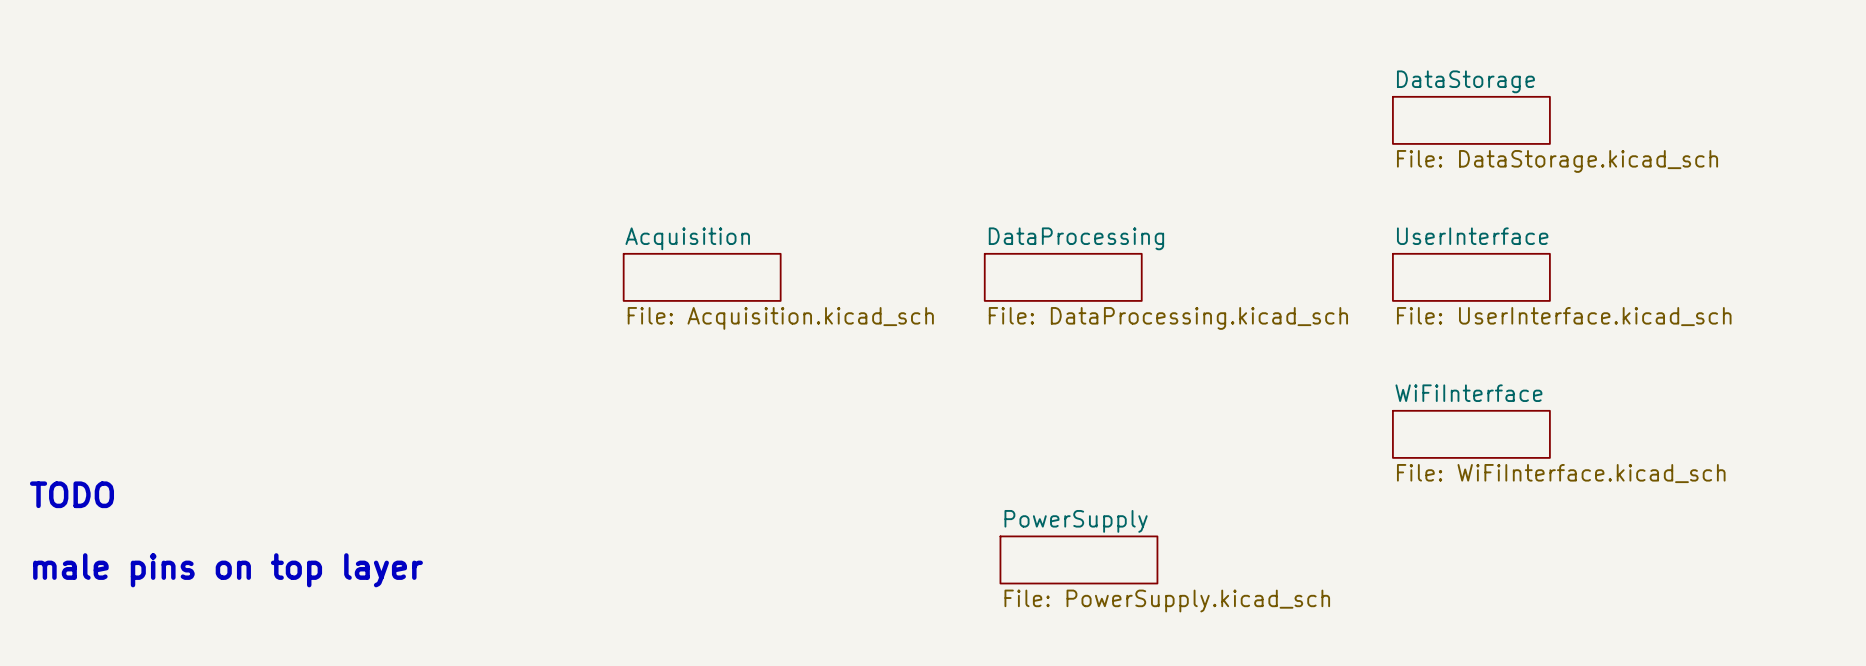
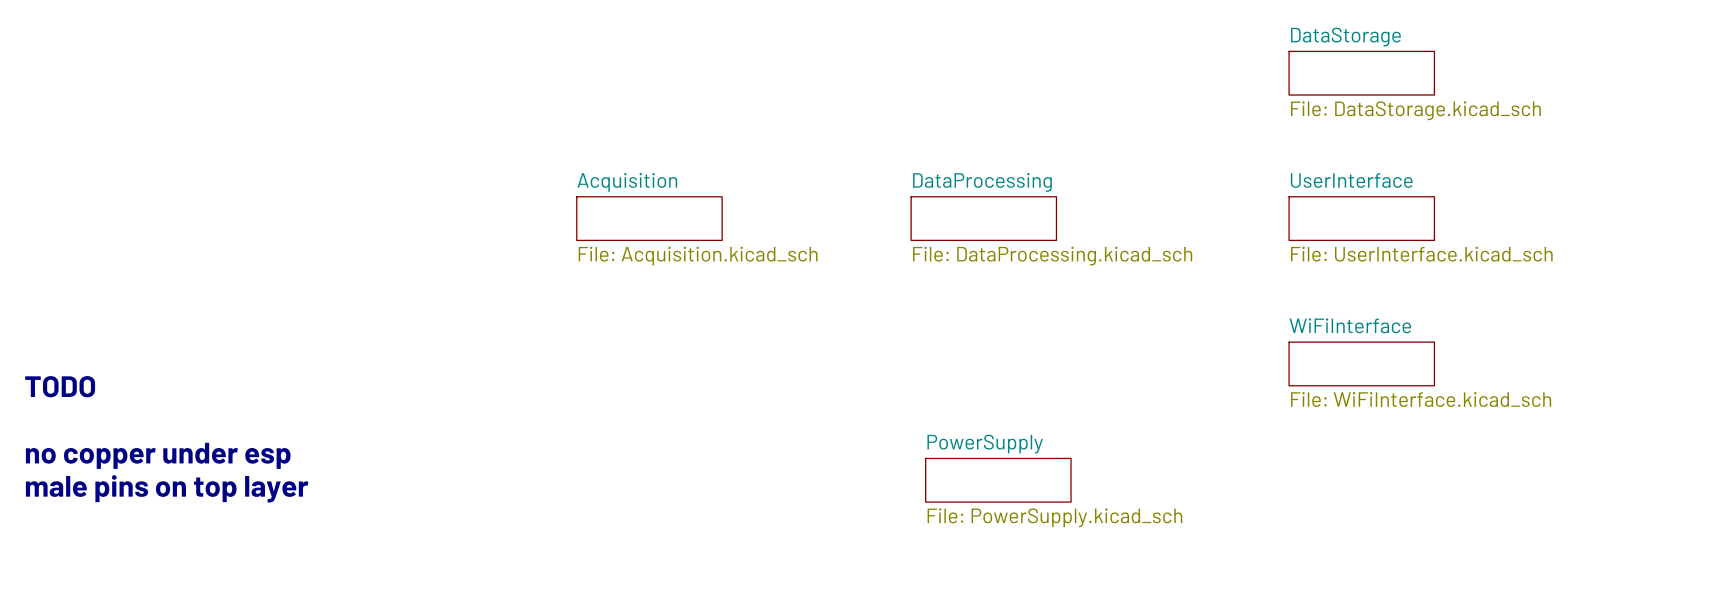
text position: TODO (71, 494) -> TODO (60, 386)
text: none -> no copper under esp (158, 455)

